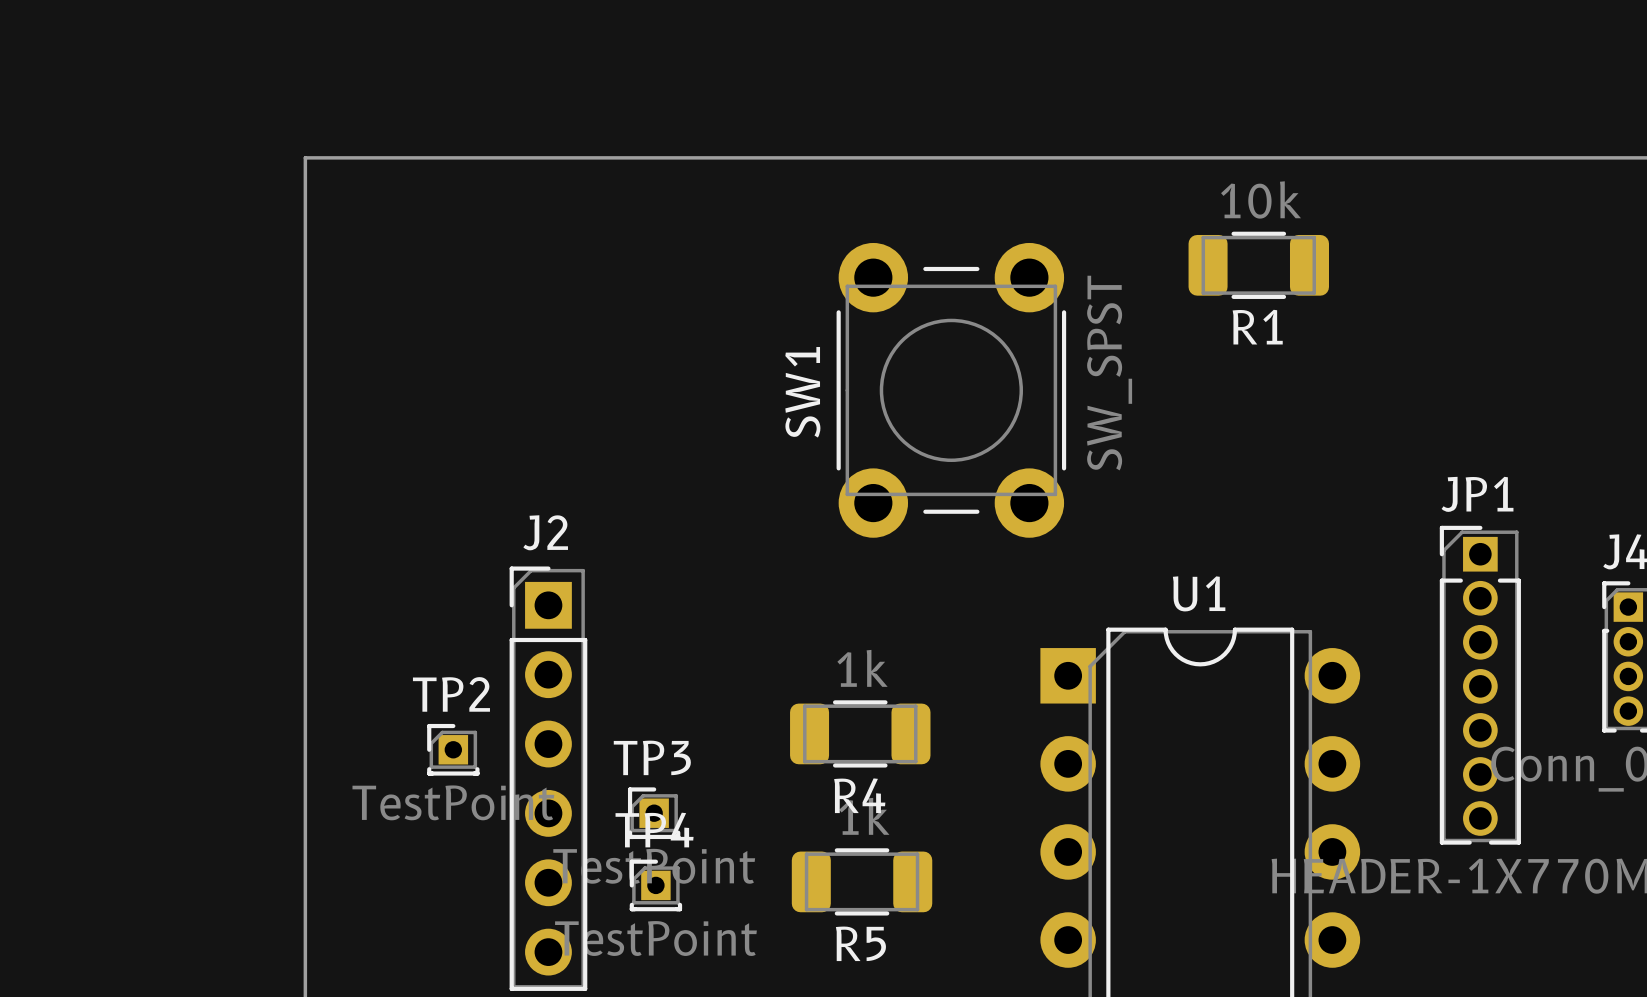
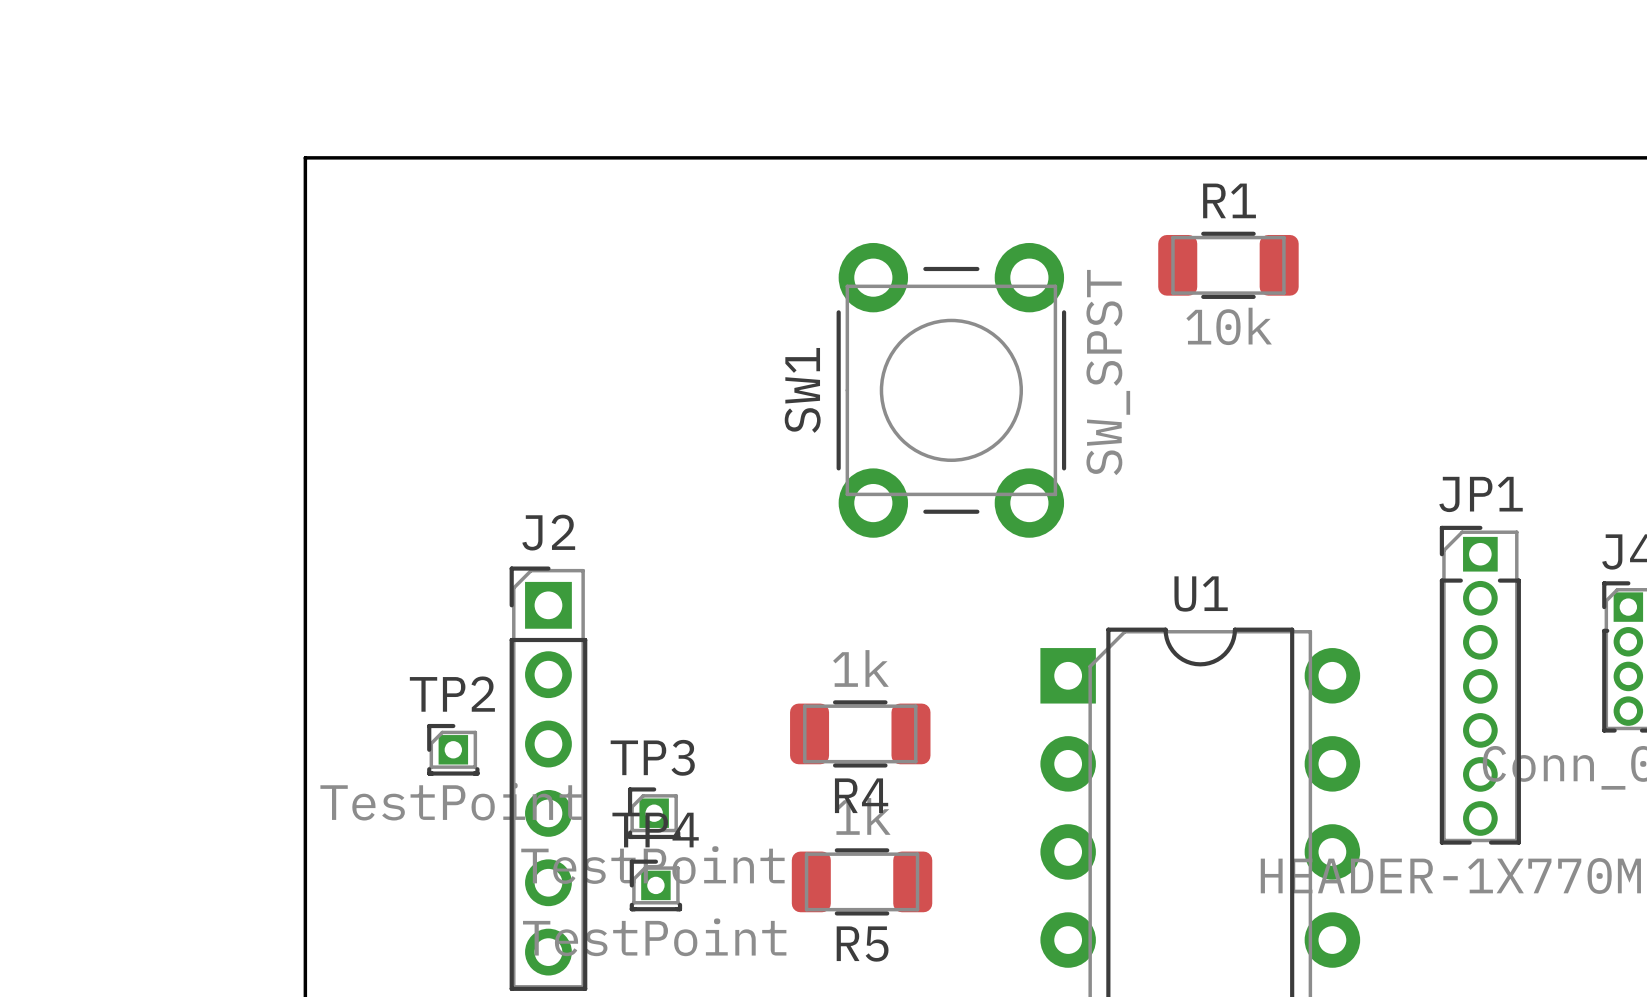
R1 value position: 10k (1261, 199) -> 10k (1229, 326)
R1 position: (1258, 265) -> (1228, 265)
R1 name position: R1 (1257, 327) -> R1 (1229, 200)

